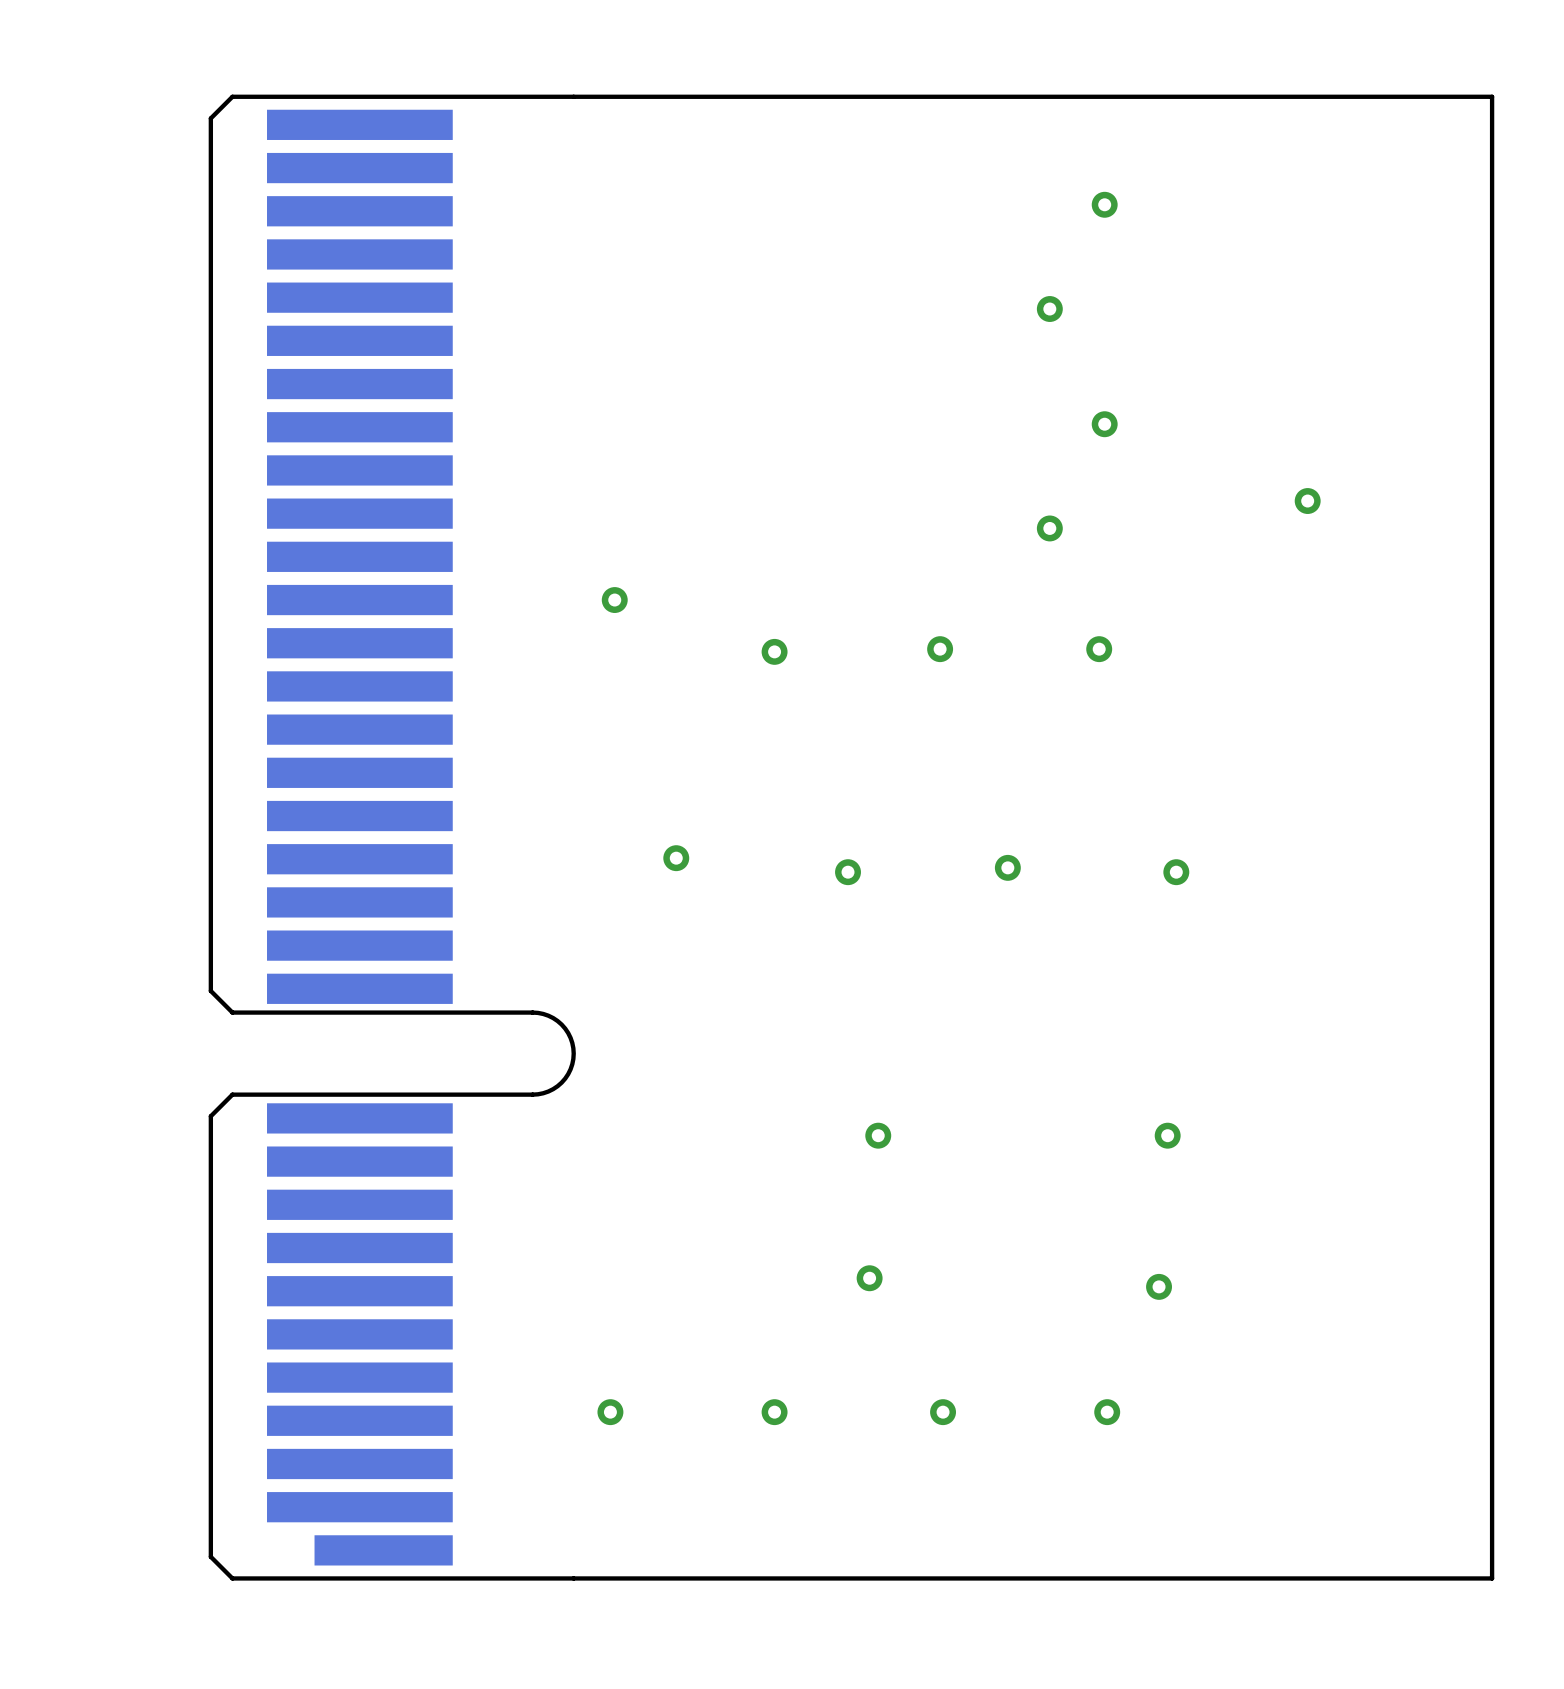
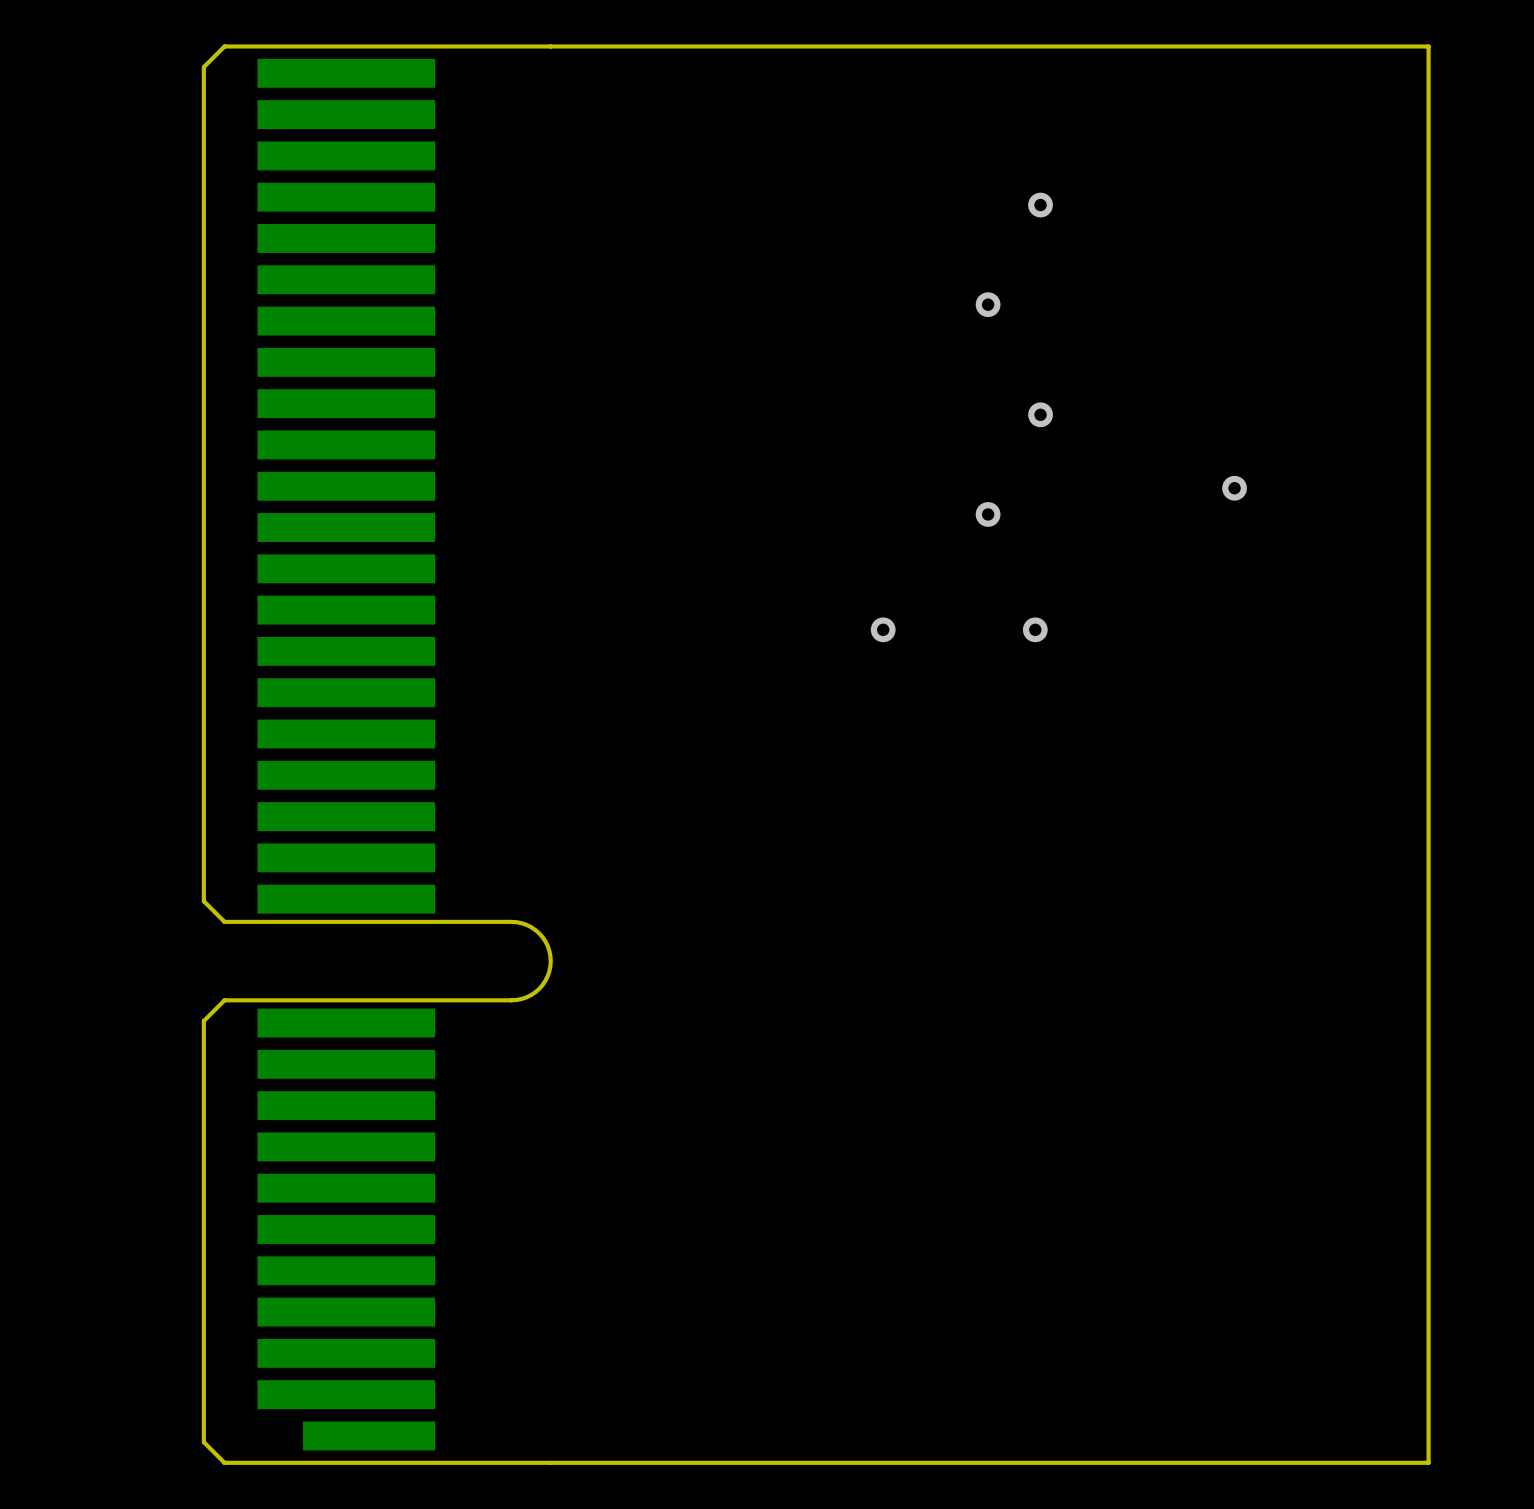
via: (1104, 204) -> none
via: none -> (1040, 205)
via: (1049, 309) -> none
via: none -> (988, 304)
via: (1104, 424) -> none
via: none -> (1040, 414)
via position: (1307, 501) -> (1234, 488)
via: (1049, 528) -> none
via: none -> (988, 514)
via: (614, 600) -> none
via: (940, 649) -> none
via: (1099, 649) -> none
via: (774, 651) -> none
via: none -> (883, 629)
via: none -> (1035, 629)
via: (676, 858) -> none
via: (1007, 867) -> none
via: (848, 872) -> none
via: (1176, 872) -> none
via: (878, 1135) -> none
via: (1167, 1135) -> none
via: (869, 1278) -> none
via: (1159, 1286) -> none
via: (610, 1412) -> none
via: (774, 1412) -> none
via: (943, 1412) -> none
via: (1107, 1412) -> none

